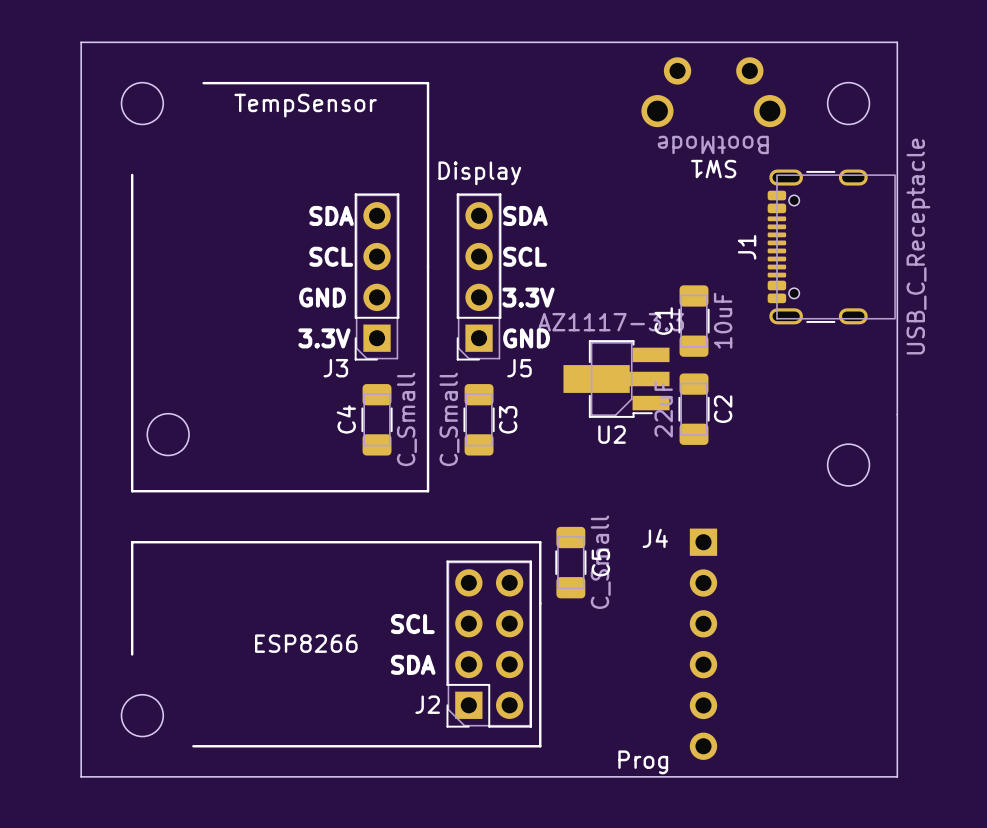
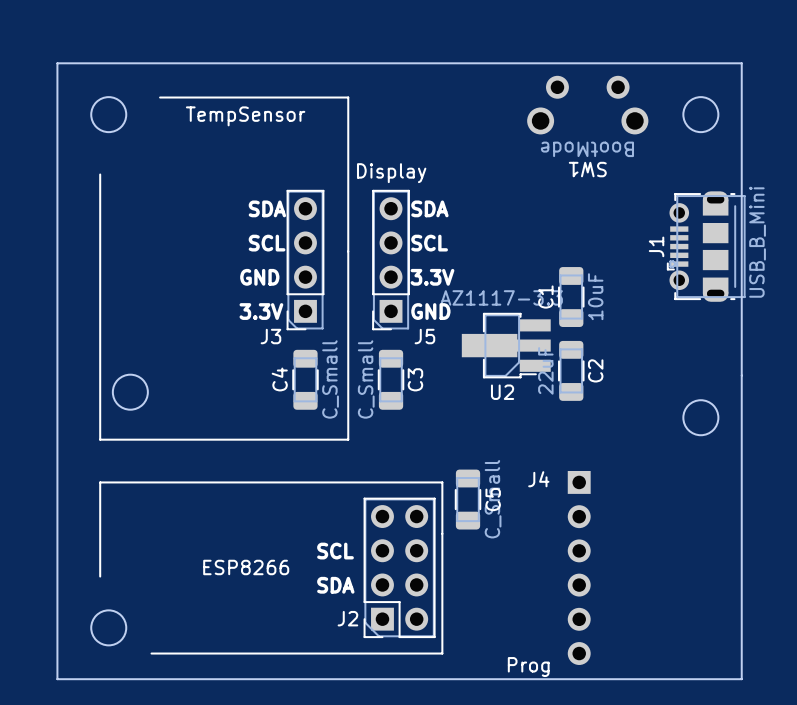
J1 footprint: [767, 169, 896, 325] -> [667, 191, 746, 302]
J1 value: USB_C_Receptacle (918, 246) -> USB_B_Mini (757, 242)

